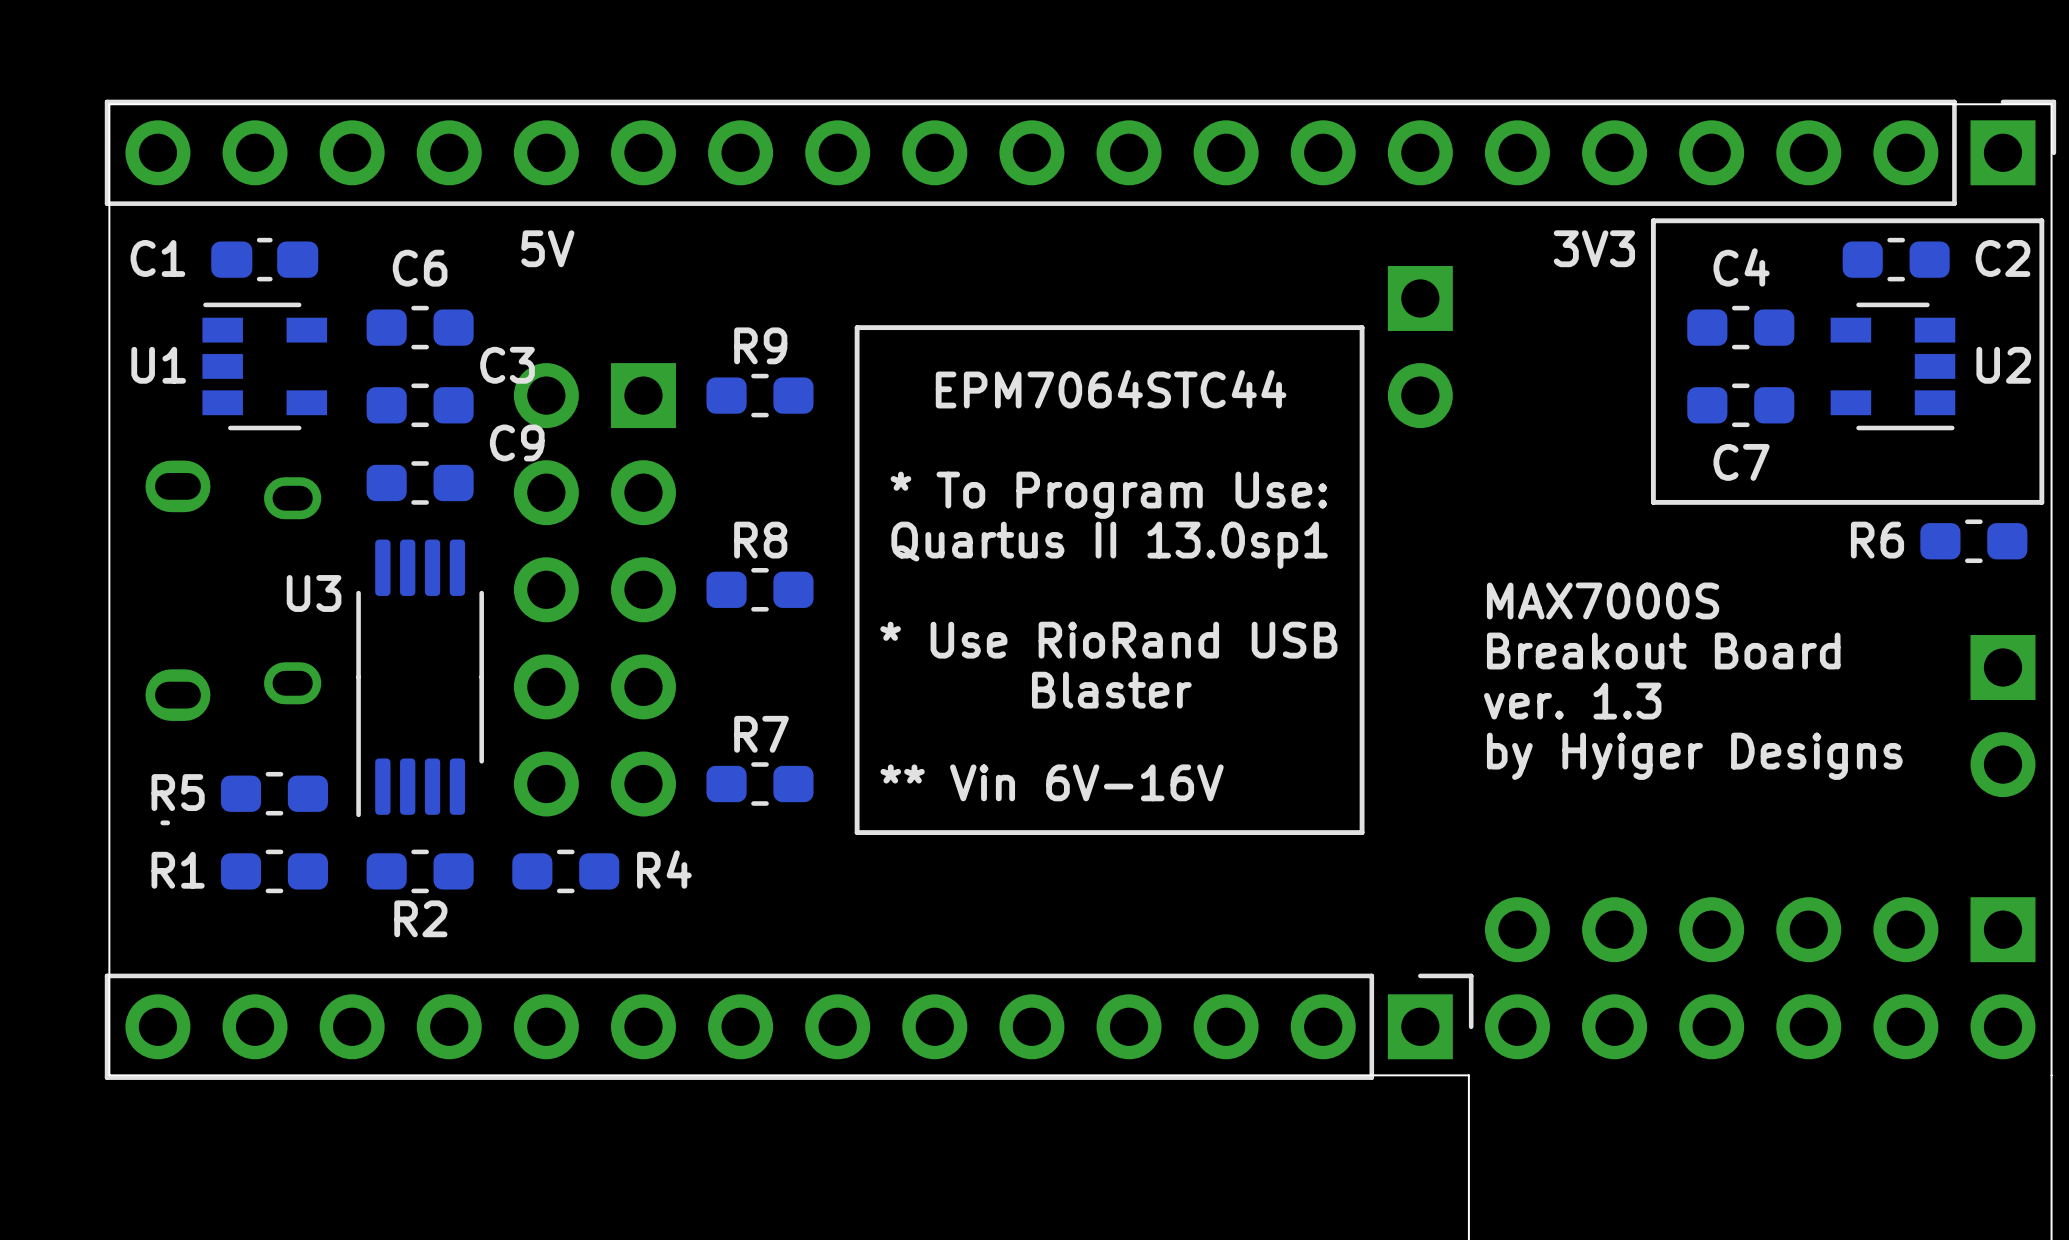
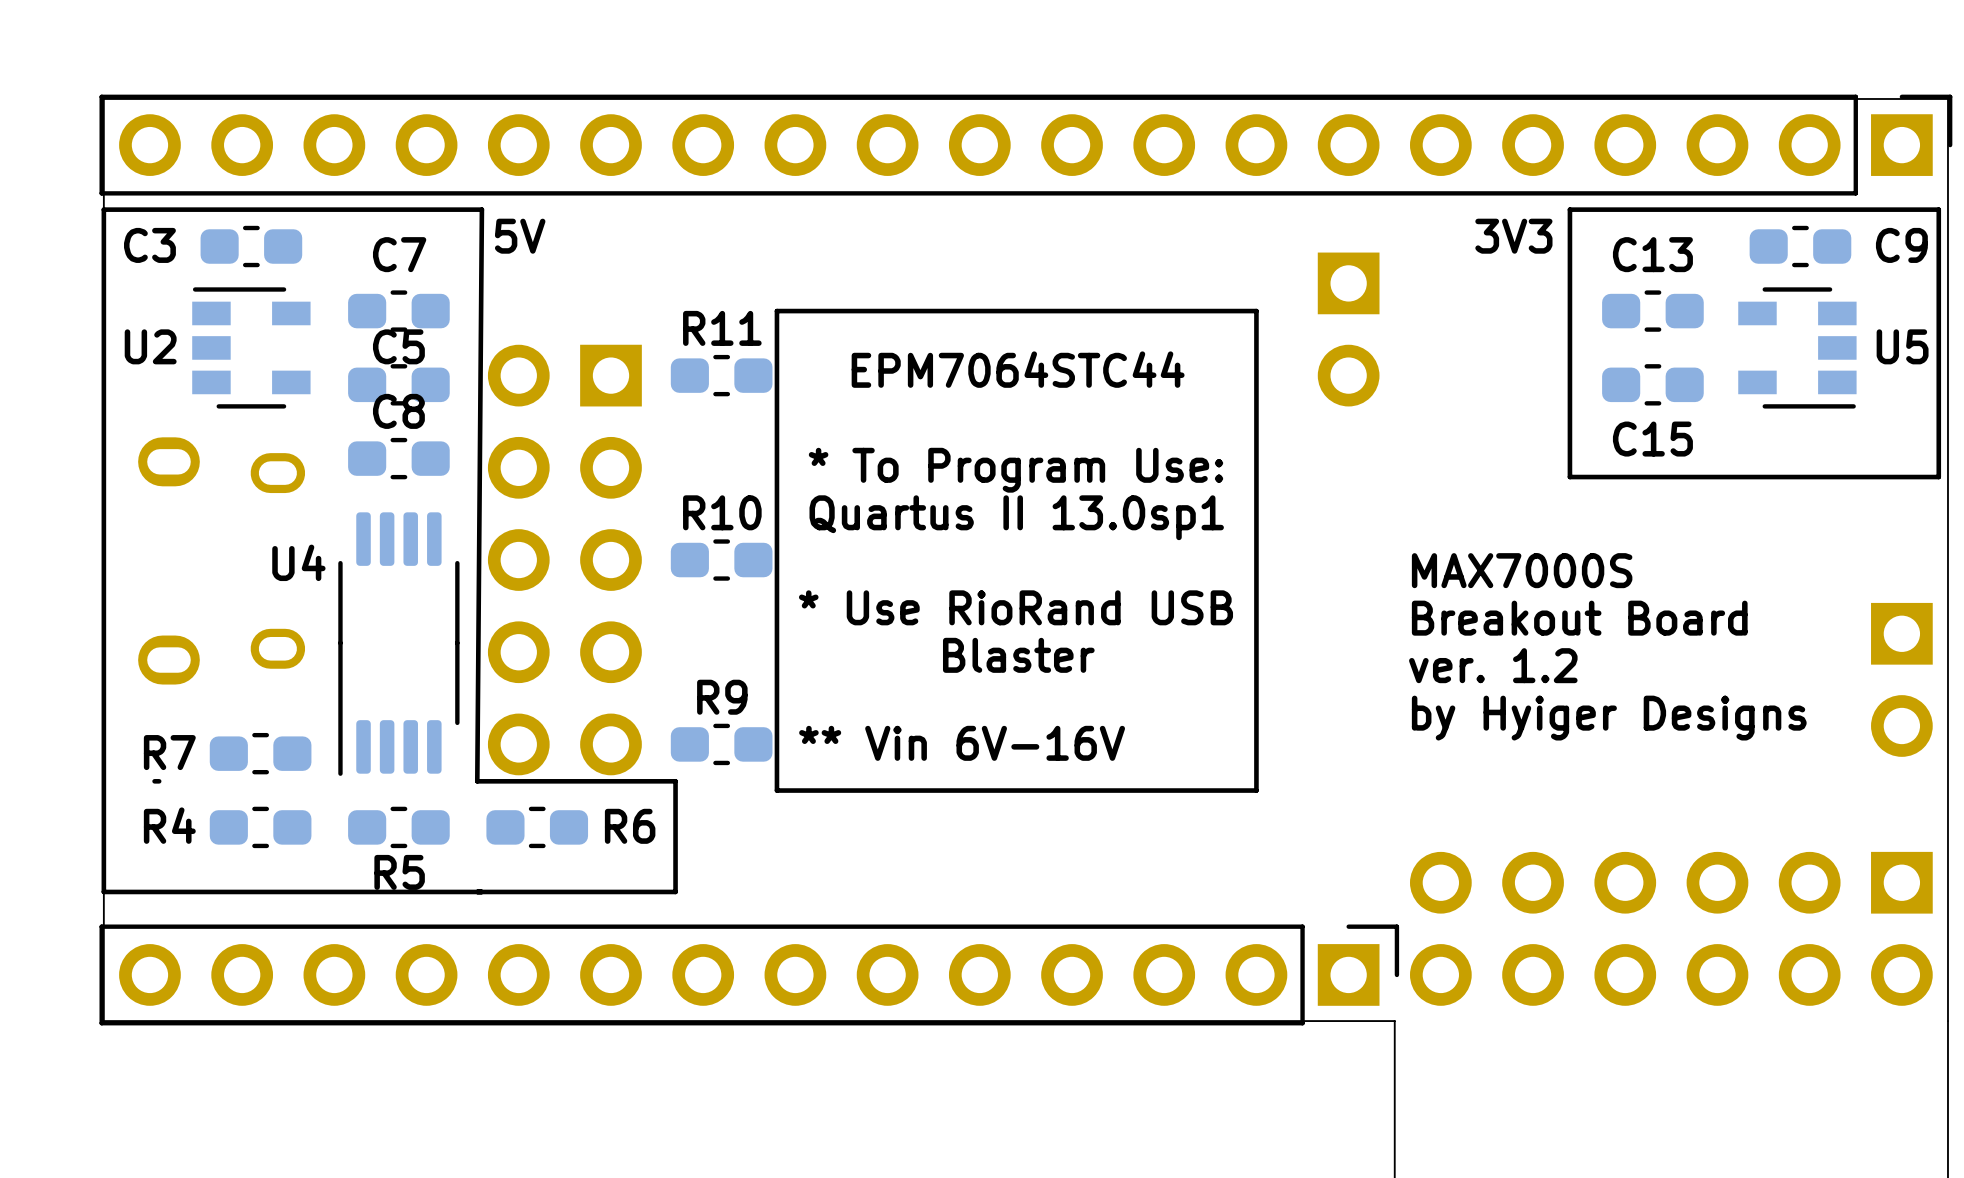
line: none -> (481, 209) (477, 781) (675, 781) (675, 891) (103, 891) (103, 209) (481, 209)
C2 name: C2 (2003, 258) -> C9 (1901, 245)
C1: (264, 259) -> none
C3: none -> (251, 246)
C4 name: C4 (1741, 267) -> C13 (1652, 254)
C6 name: C6 (420, 268) -> C7 (399, 254)
line: (857, 327) (857, 832) -> (813, 311) (776, 311) (776, 790) (813, 790)
line: (1323, 327) (1362, 327) (1362, 832) (1323, 832) -> (1256, 311) (1256, 790)
R9 name: R9 (760, 345) -> R11 (722, 328)
U1 name: U1 (158, 365) -> U2 (150, 346)
C3 name: C3 (507, 365) -> C5 (398, 346)
U2 name: U2 (2003, 365) -> U5 (1902, 346)
text position: EPM7064STC44 (1111, 389) -> EPM7064STC44 (1018, 369)
C9 name: C9 (517, 442) -> C8 (398, 411)
C7 name: C7 (1741, 462) -> C15 (1652, 439)
text position: * To Program Use: (1108, 495) -> * To Program Use: (1016, 470)
R8 name: R8 (760, 540) -> R10 (722, 512)
R6: (1973, 541) -> none
text position: Quartus II 13.0sp1 (1109, 545) -> Quartus II 13.0sp1 (1016, 517)
U3 name: U3 (314, 593) -> U4 (298, 562)
text position: * Use RioRand USB (1108, 640) -> * Use RioRand USB (1016, 607)
text position: Blaster (1111, 690) -> Blaster (1018, 655)
text: ver. 1.3 (1572, 701) -> ver. 1.2 (1493, 665)
R7 name: R7 (761, 734) -> R9 (722, 697)
text position: ** Vin 6V-16V (1052, 782) -> ** Vin 6V-16V (962, 743)
R5 name: R5 (178, 792) -> R7 (169, 752)
R4 name: R4 (664, 869) -> R6 (630, 826)
R1 name: R1 (178, 870) -> R4 (169, 825)
R2 name: R2 (420, 918) -> R5 (399, 872)

